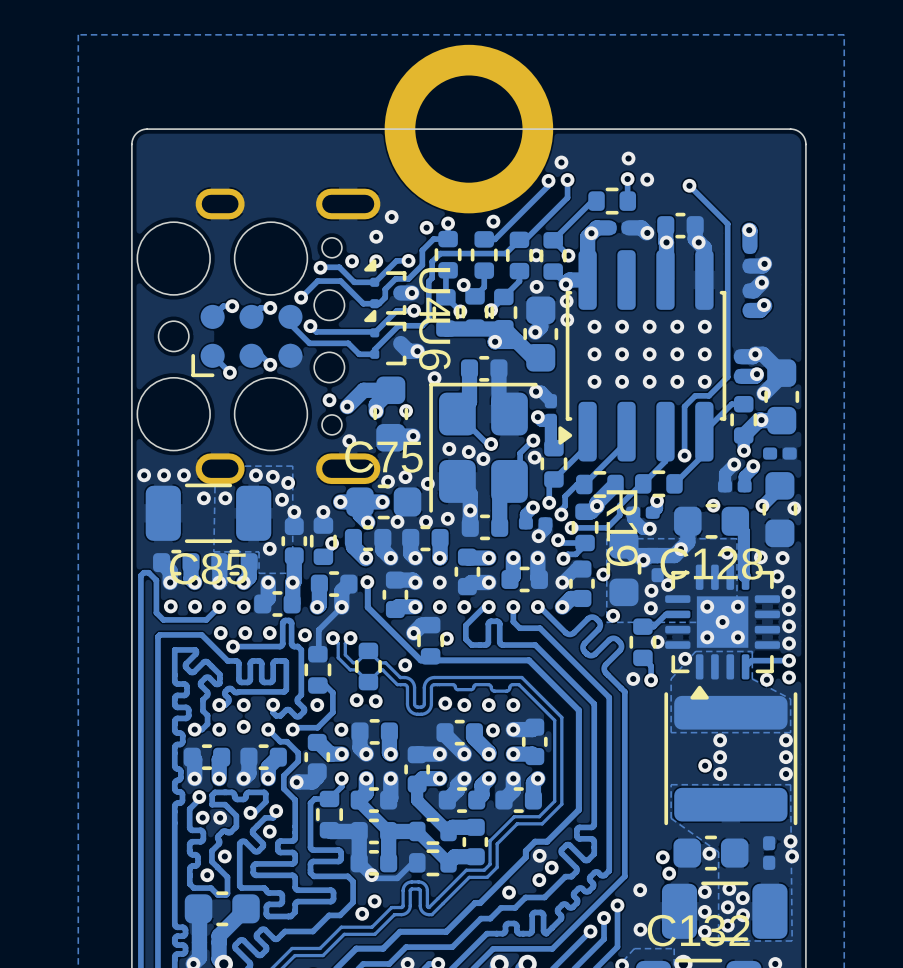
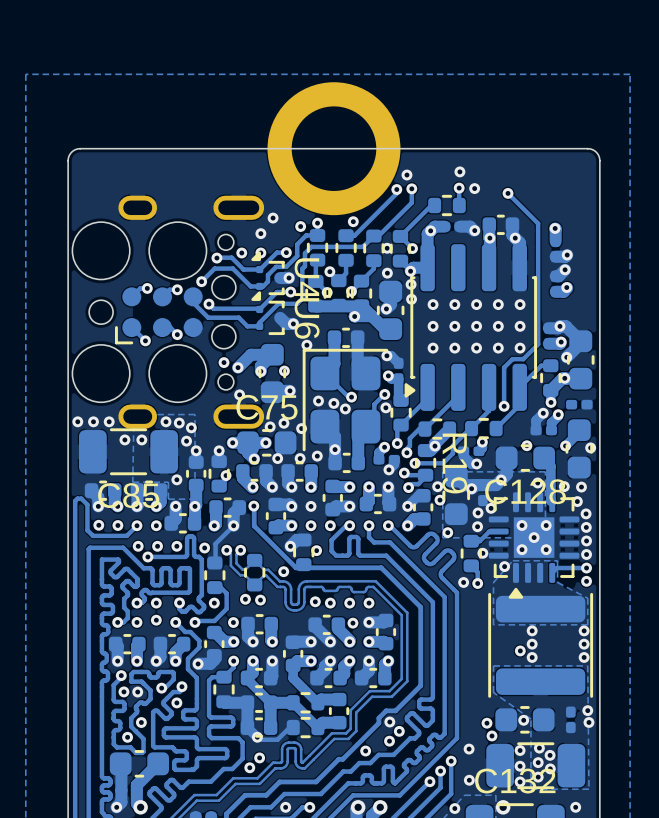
via: none -> (437, 486)
via: (766, 679) -> none

